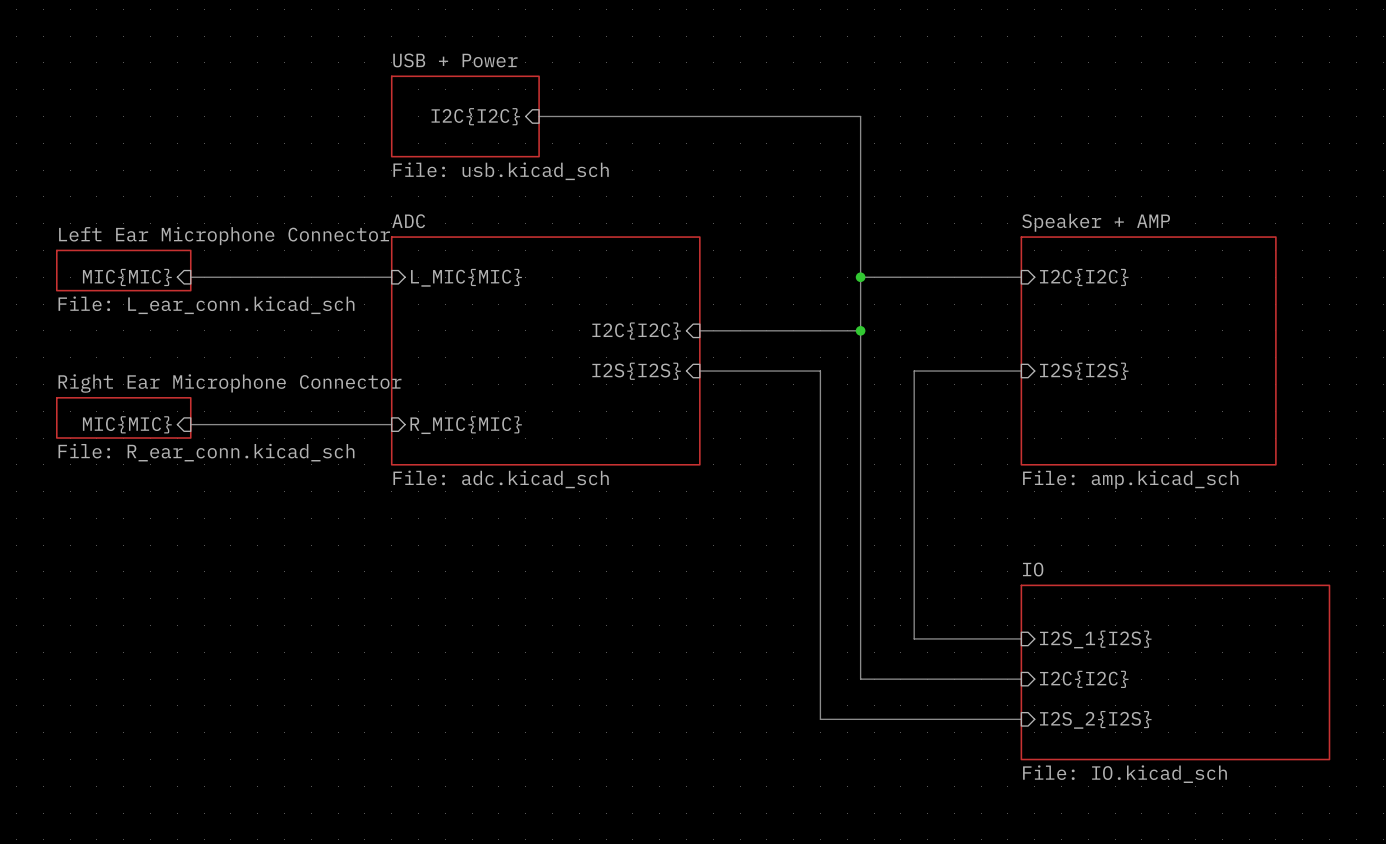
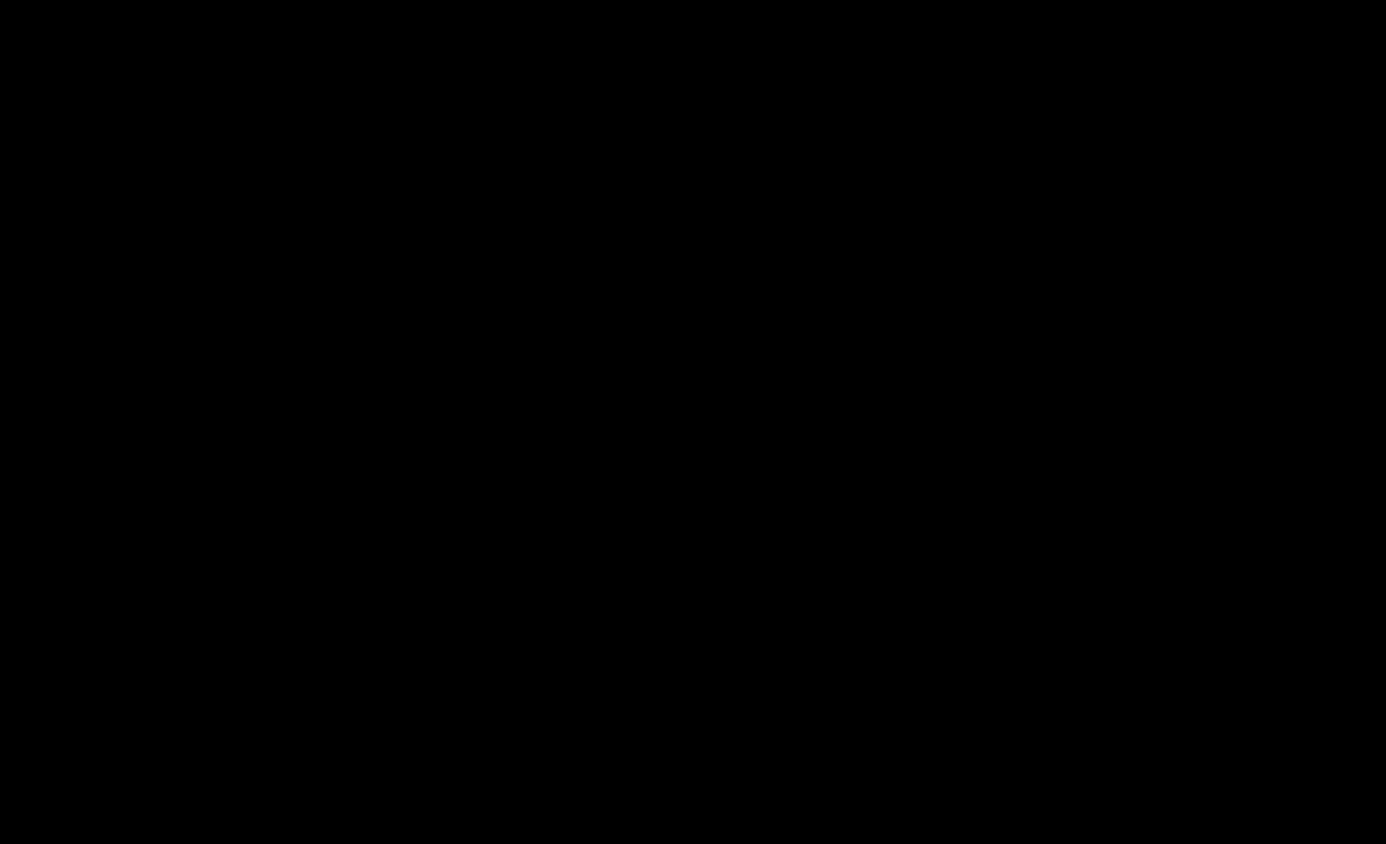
sheet USB + Power: File: usb.kicad_sch (465, 116) -> none
sheet pin: I2C{I2C} (475, 116) -> none
bus: (539, 116) (860, 116) (860, 679) (1021, 679) -> none
sheet Left Ear Microphone Connector: File: L_ear_conn.kicad_sch (123, 270) -> none
sheet pin: MIC{MIC} (127, 277) -> none
bus: (190, 277) (391, 277) -> none
sheet pin: L_MIC{MIC} (466, 277) -> none
bus: (860, 277) (1021, 277) -> none
junction: (860, 277) -> none
sheet pin: I2C{I2C} (1084, 277) -> none
bus: (699, 330) (860, 330) -> none
junction: (860, 330) -> none
sheet pin: I2C{I2C} (636, 331) -> none
sheet ADC: File: adc.kicad_sch (545, 350) -> none
sheet Speaker + AMP: File: amp.kicad_sch (1148, 350) -> none
sheet pin: I2S{I2S} (636, 371) -> none
bus: (699, 371) (820, 371) (820, 719) (1021, 719) -> none
bus: (1021, 371) (914, 371) (914, 638) (1021, 638) -> none
sheet pin: I2S{I2S} (1084, 371) -> none
sheet Right Ear Microphone Connector: File: R_ear_conn.kicad_sch (123, 417) -> none
sheet pin: MIC{MIC} (127, 424) -> none
bus: (190, 424) (391, 424) -> none
sheet pin: R_MIC{MIC} (466, 425) -> none
sheet pin: I2S_1{I2S} (1095, 639) -> none
sheet IO: File: IO.kicad_sch (1175, 672) -> none
sheet pin: I2C{I2C} (1084, 679) -> none
sheet pin: I2S_2{I2S} (1095, 719) -> none

